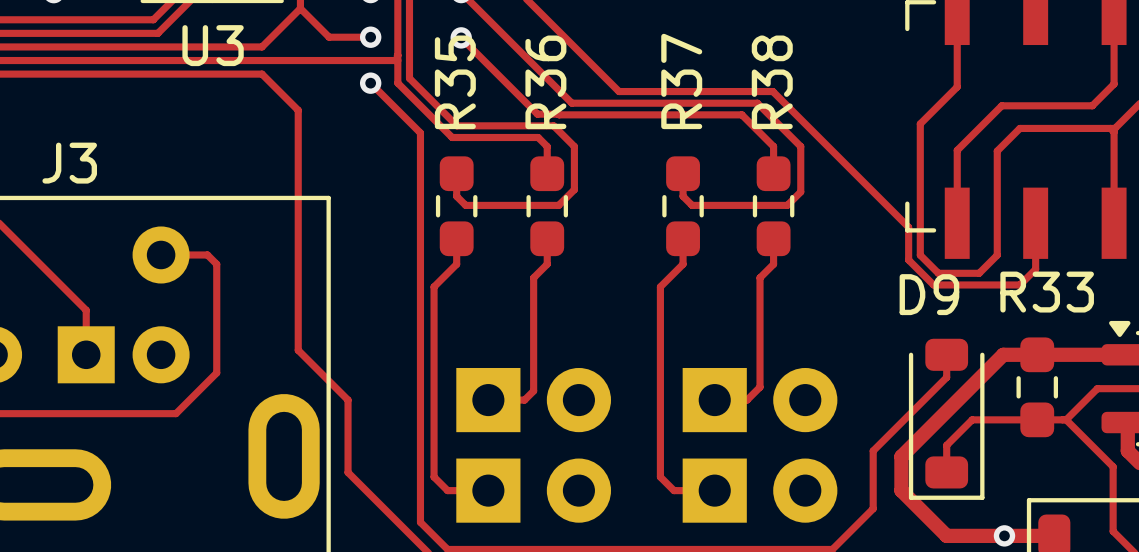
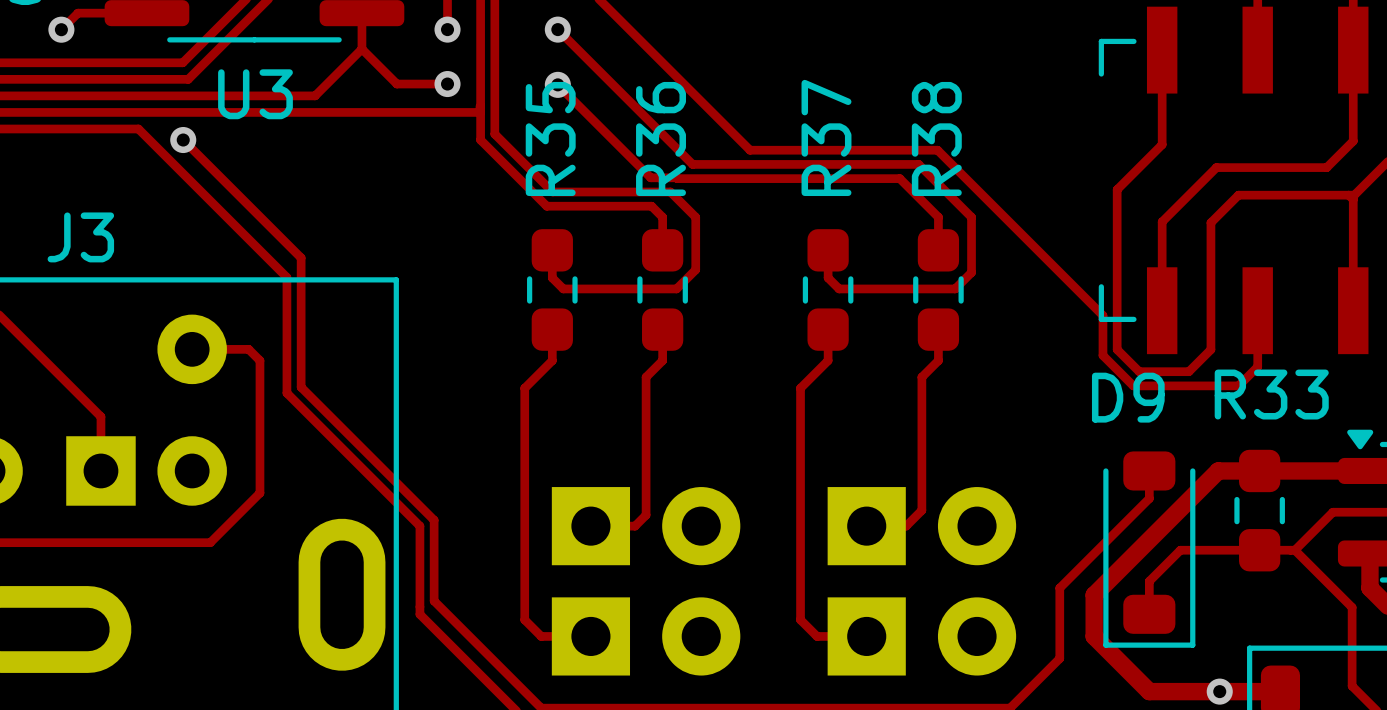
track: (117, 74) (262, 74) (298, 110) (298, 350) -> (138, 128) (286, 277) (286, 393) (359, 465)
via: none -> (183, 140)
track: (370, 83) (420, 132) (420, 522) -> (183, 140) (301, 257) (301, 387) (434, 520) (434, 601) (508, 675)
via: (370, 83) -> none

